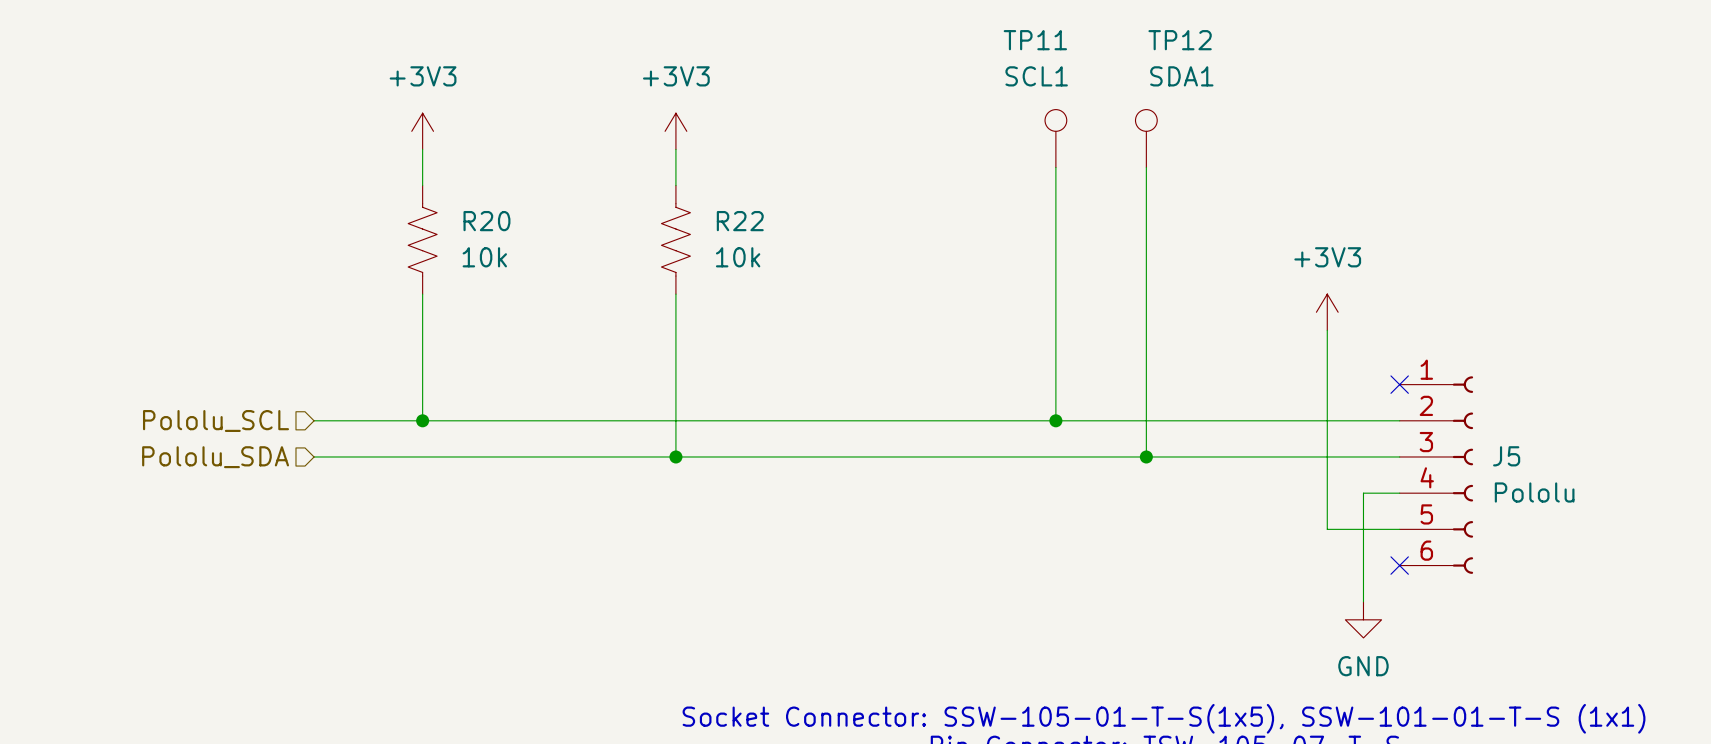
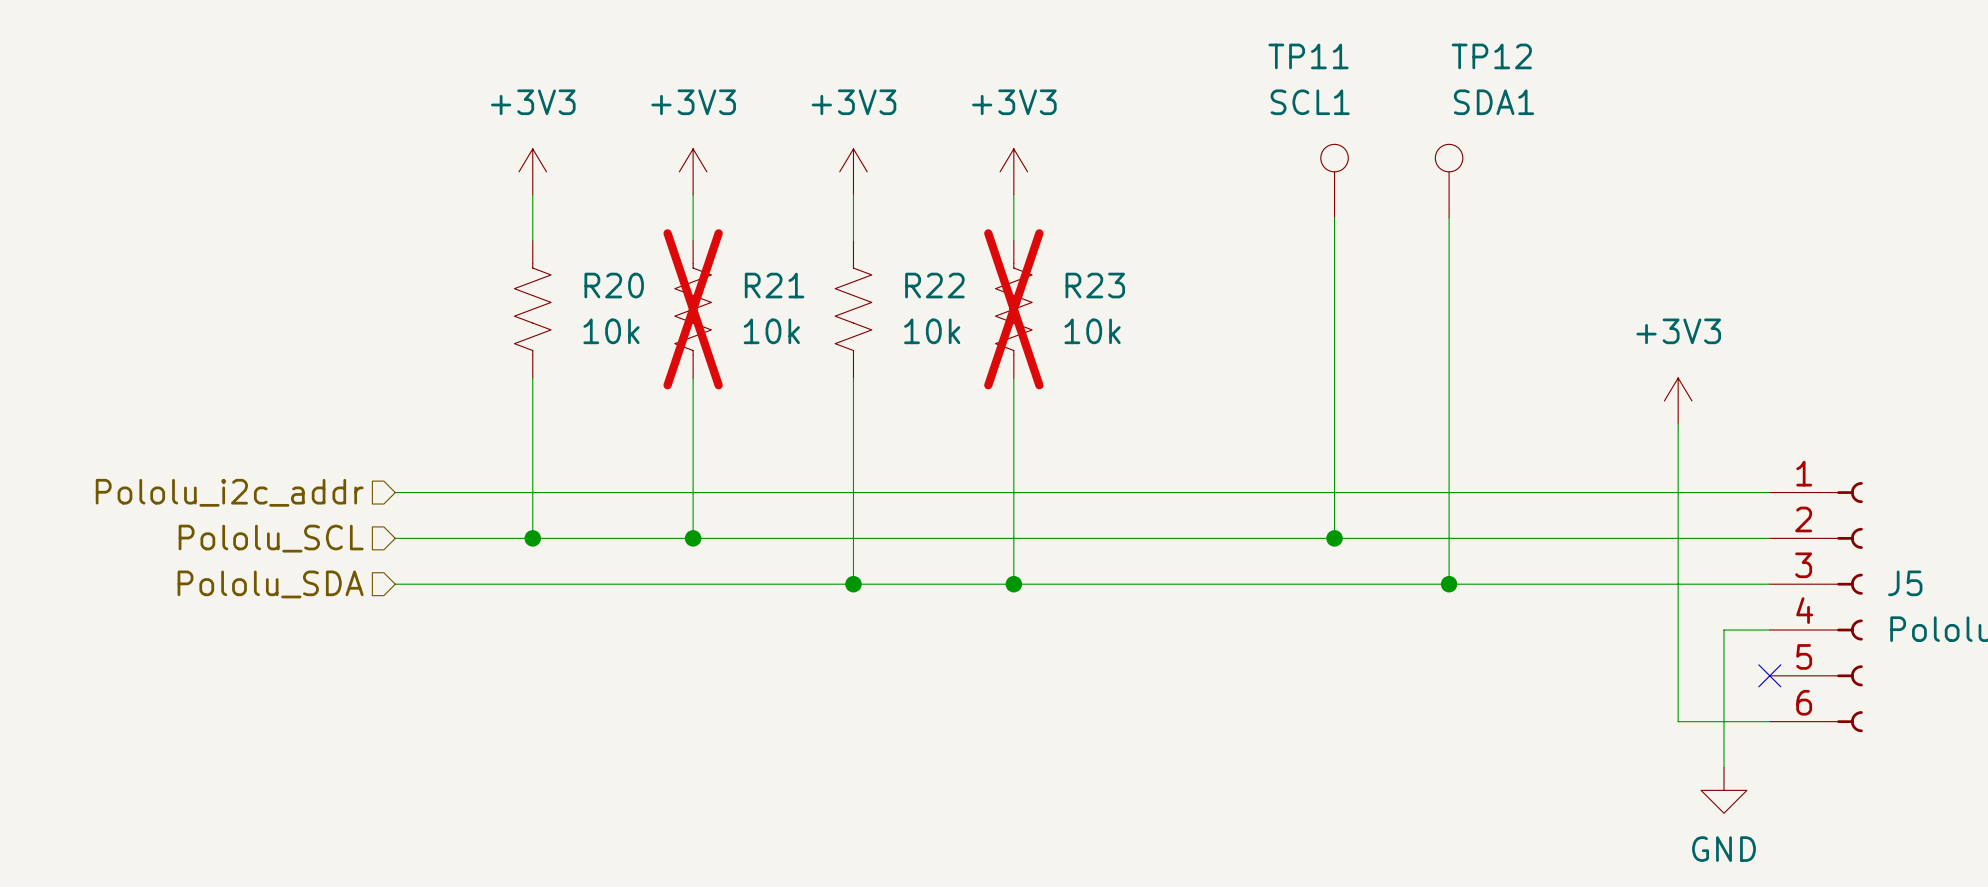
power symbol: none -> +3V3 (693, 171)
power symbol: none -> +3V3 (1013, 171)
wire: none -> (693, 194) (693, 240)
wire: none -> (1013, 194) (1013, 240)
R21: none -> 10k (693, 309)
R23: none -> 10k (1013, 309)
wire: none -> (693, 378) (693, 538)
wire: none -> (1013, 378) (1013, 584)
hierarchical label: none -> Pololu_i2c_addr (229, 492)
wire: none -> (395, 492) (1769, 492)
no-connect mark: (1399, 384) -> none
junction: none -> (693, 538)
junction: none -> (1013, 584)
wire: (1327, 529) (1399, 529) -> (1678, 675) (1678, 721) (1769, 721)
no-connect mark position: (1399, 565) -> (1769, 675)

